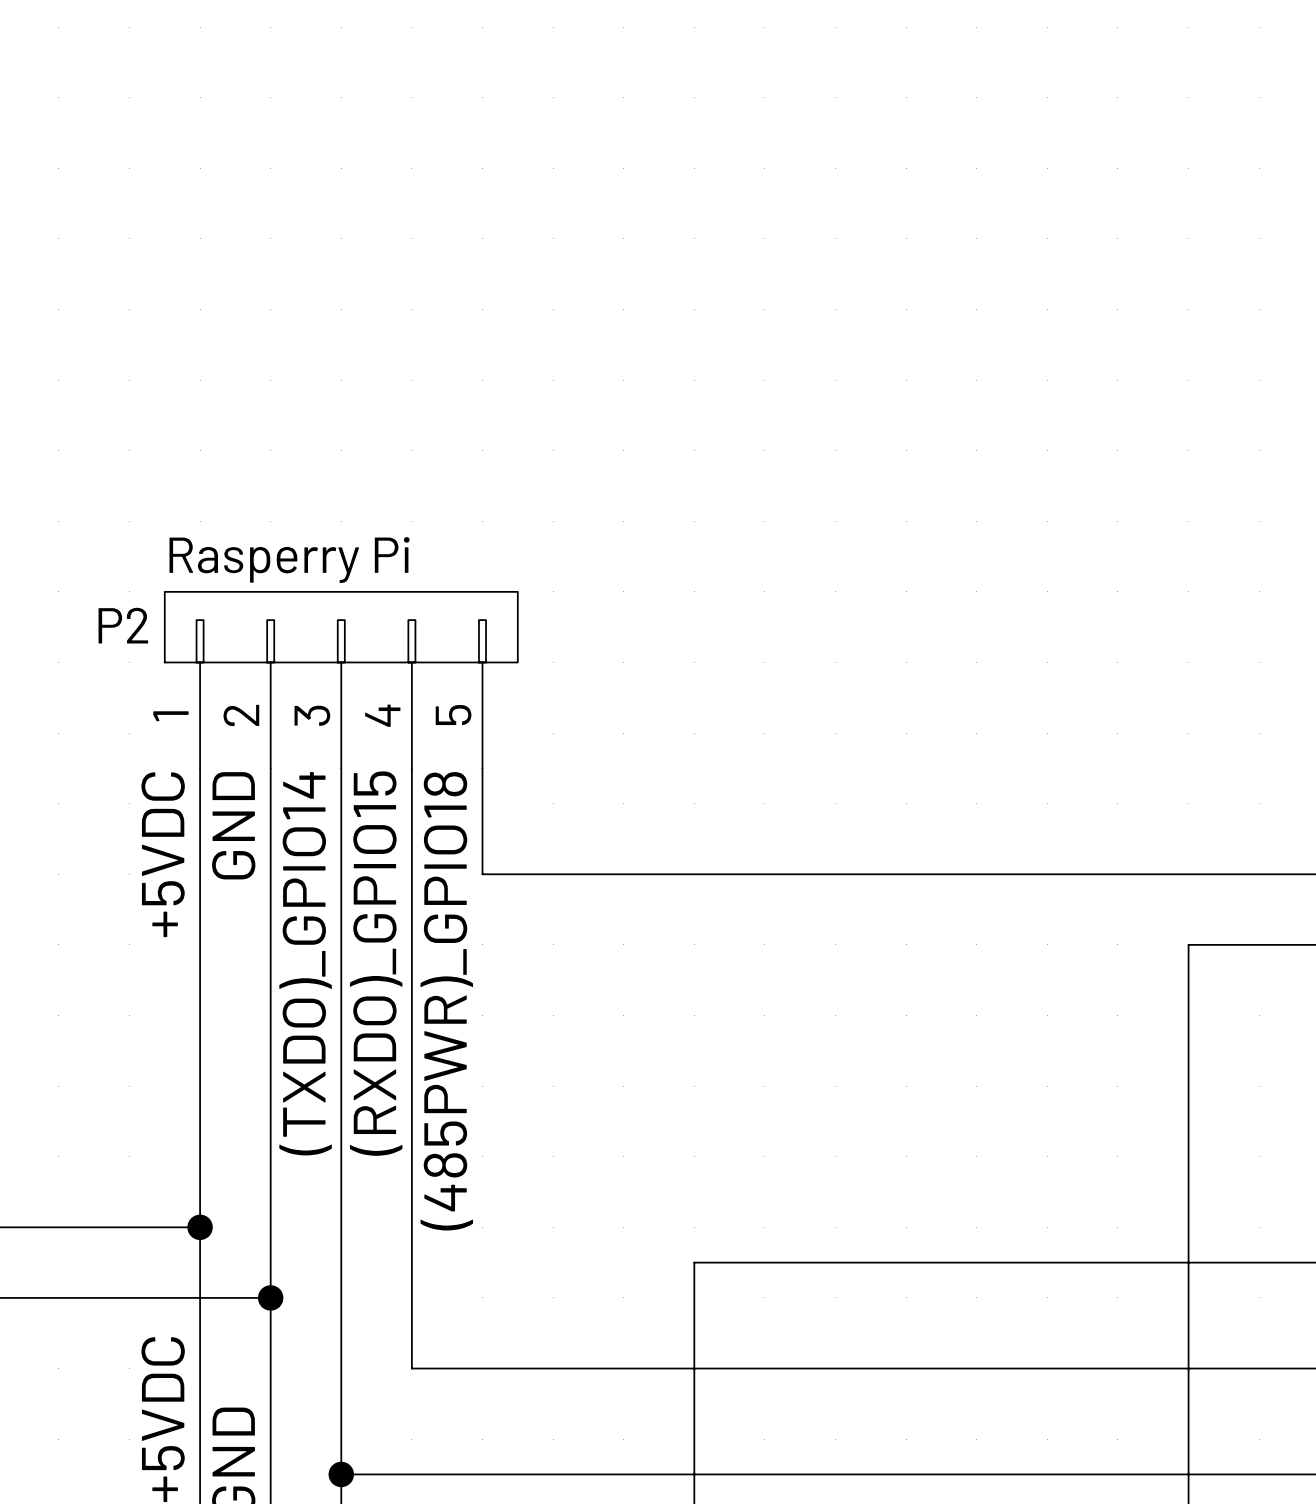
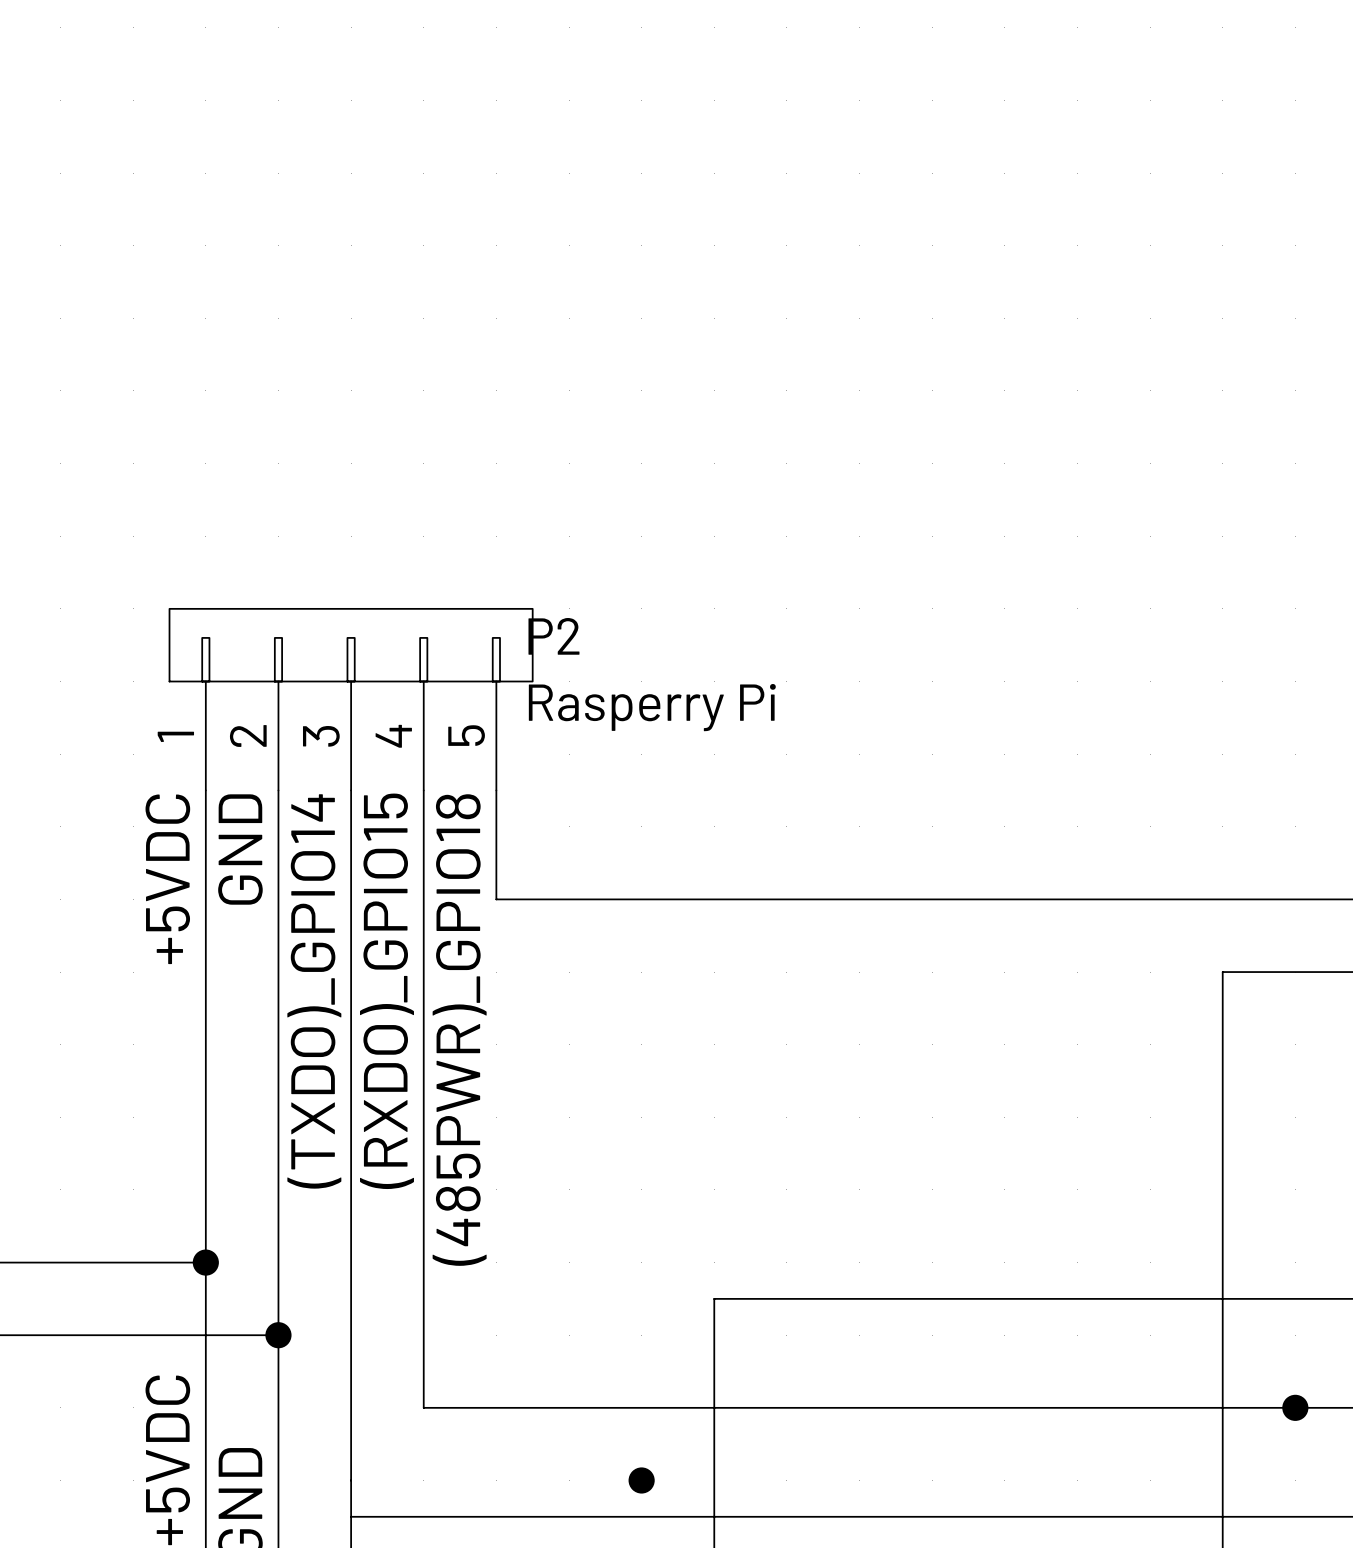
P2 value position: Rasperry Pi (289, 560) -> Rasperry Pi (652, 707)
P2 name position: P2 (123, 625) -> P2 (553, 636)
junction: none -> (1295, 1407)
junction: none -> (641, 1480)
junction: (341, 1474) -> none

